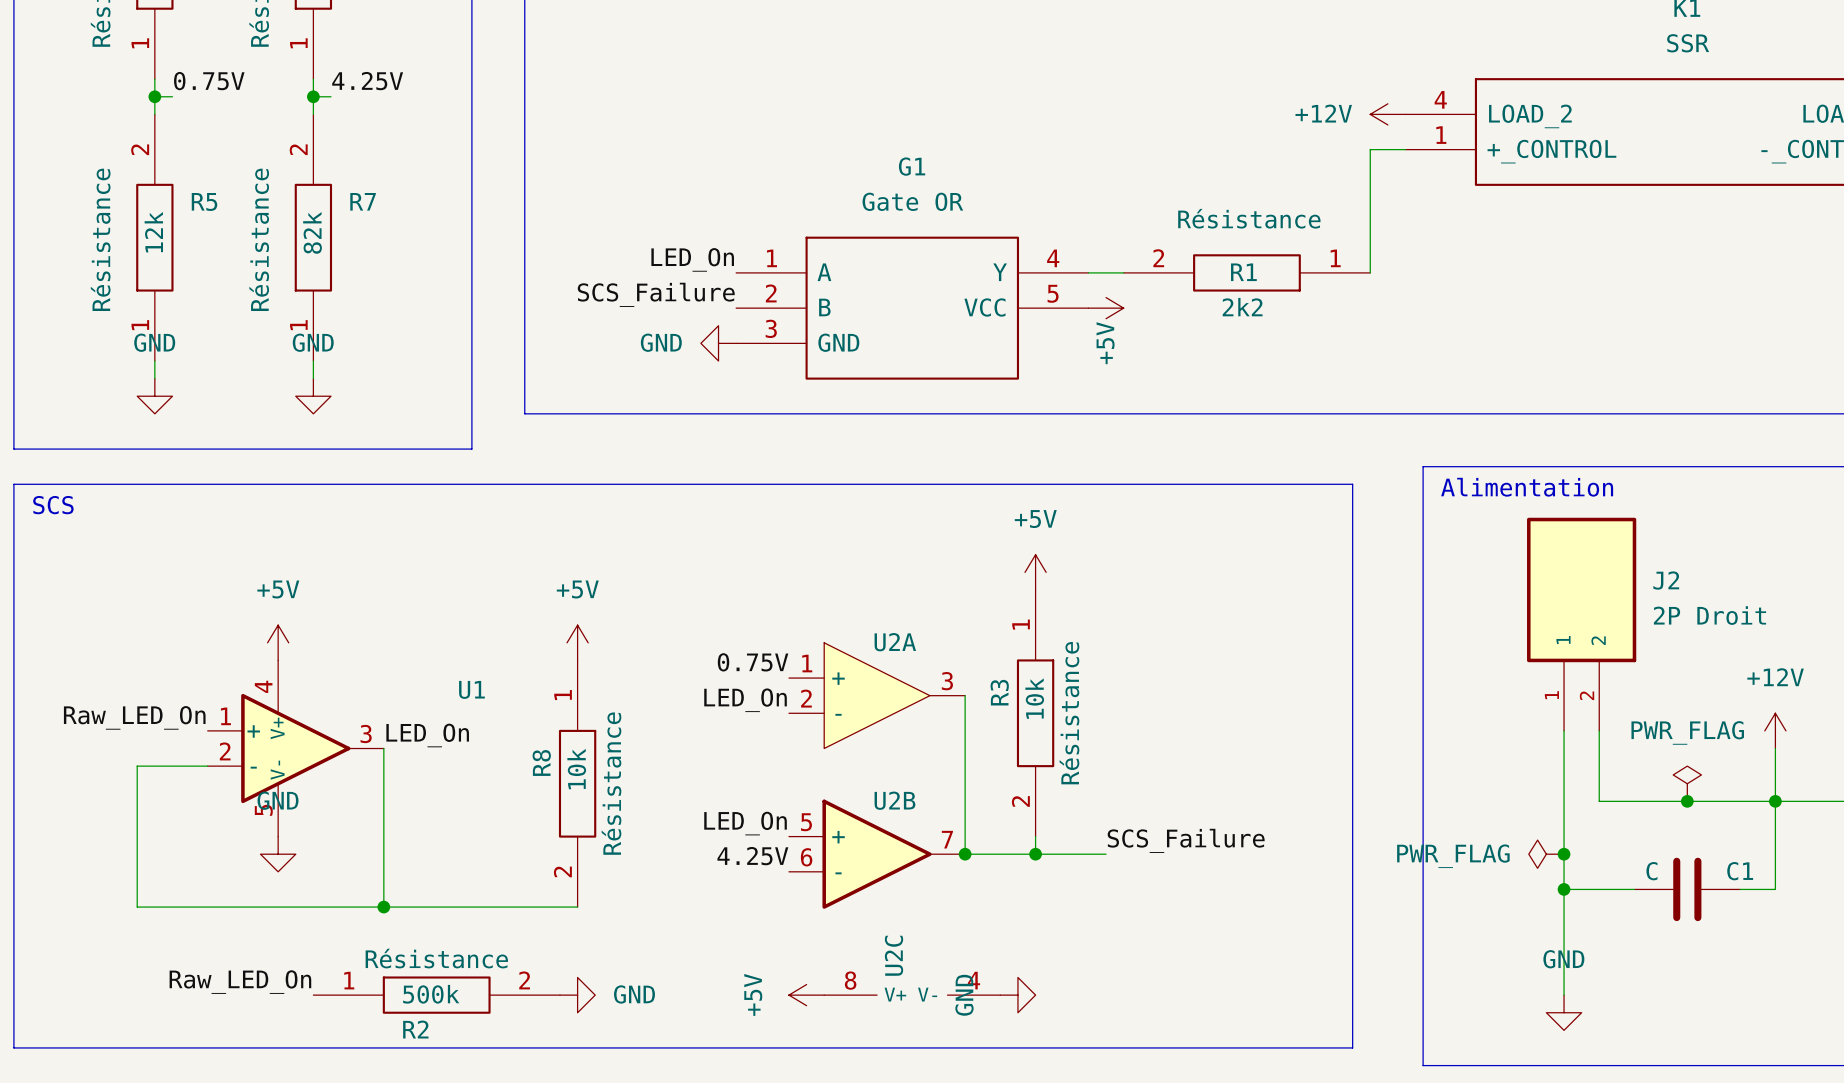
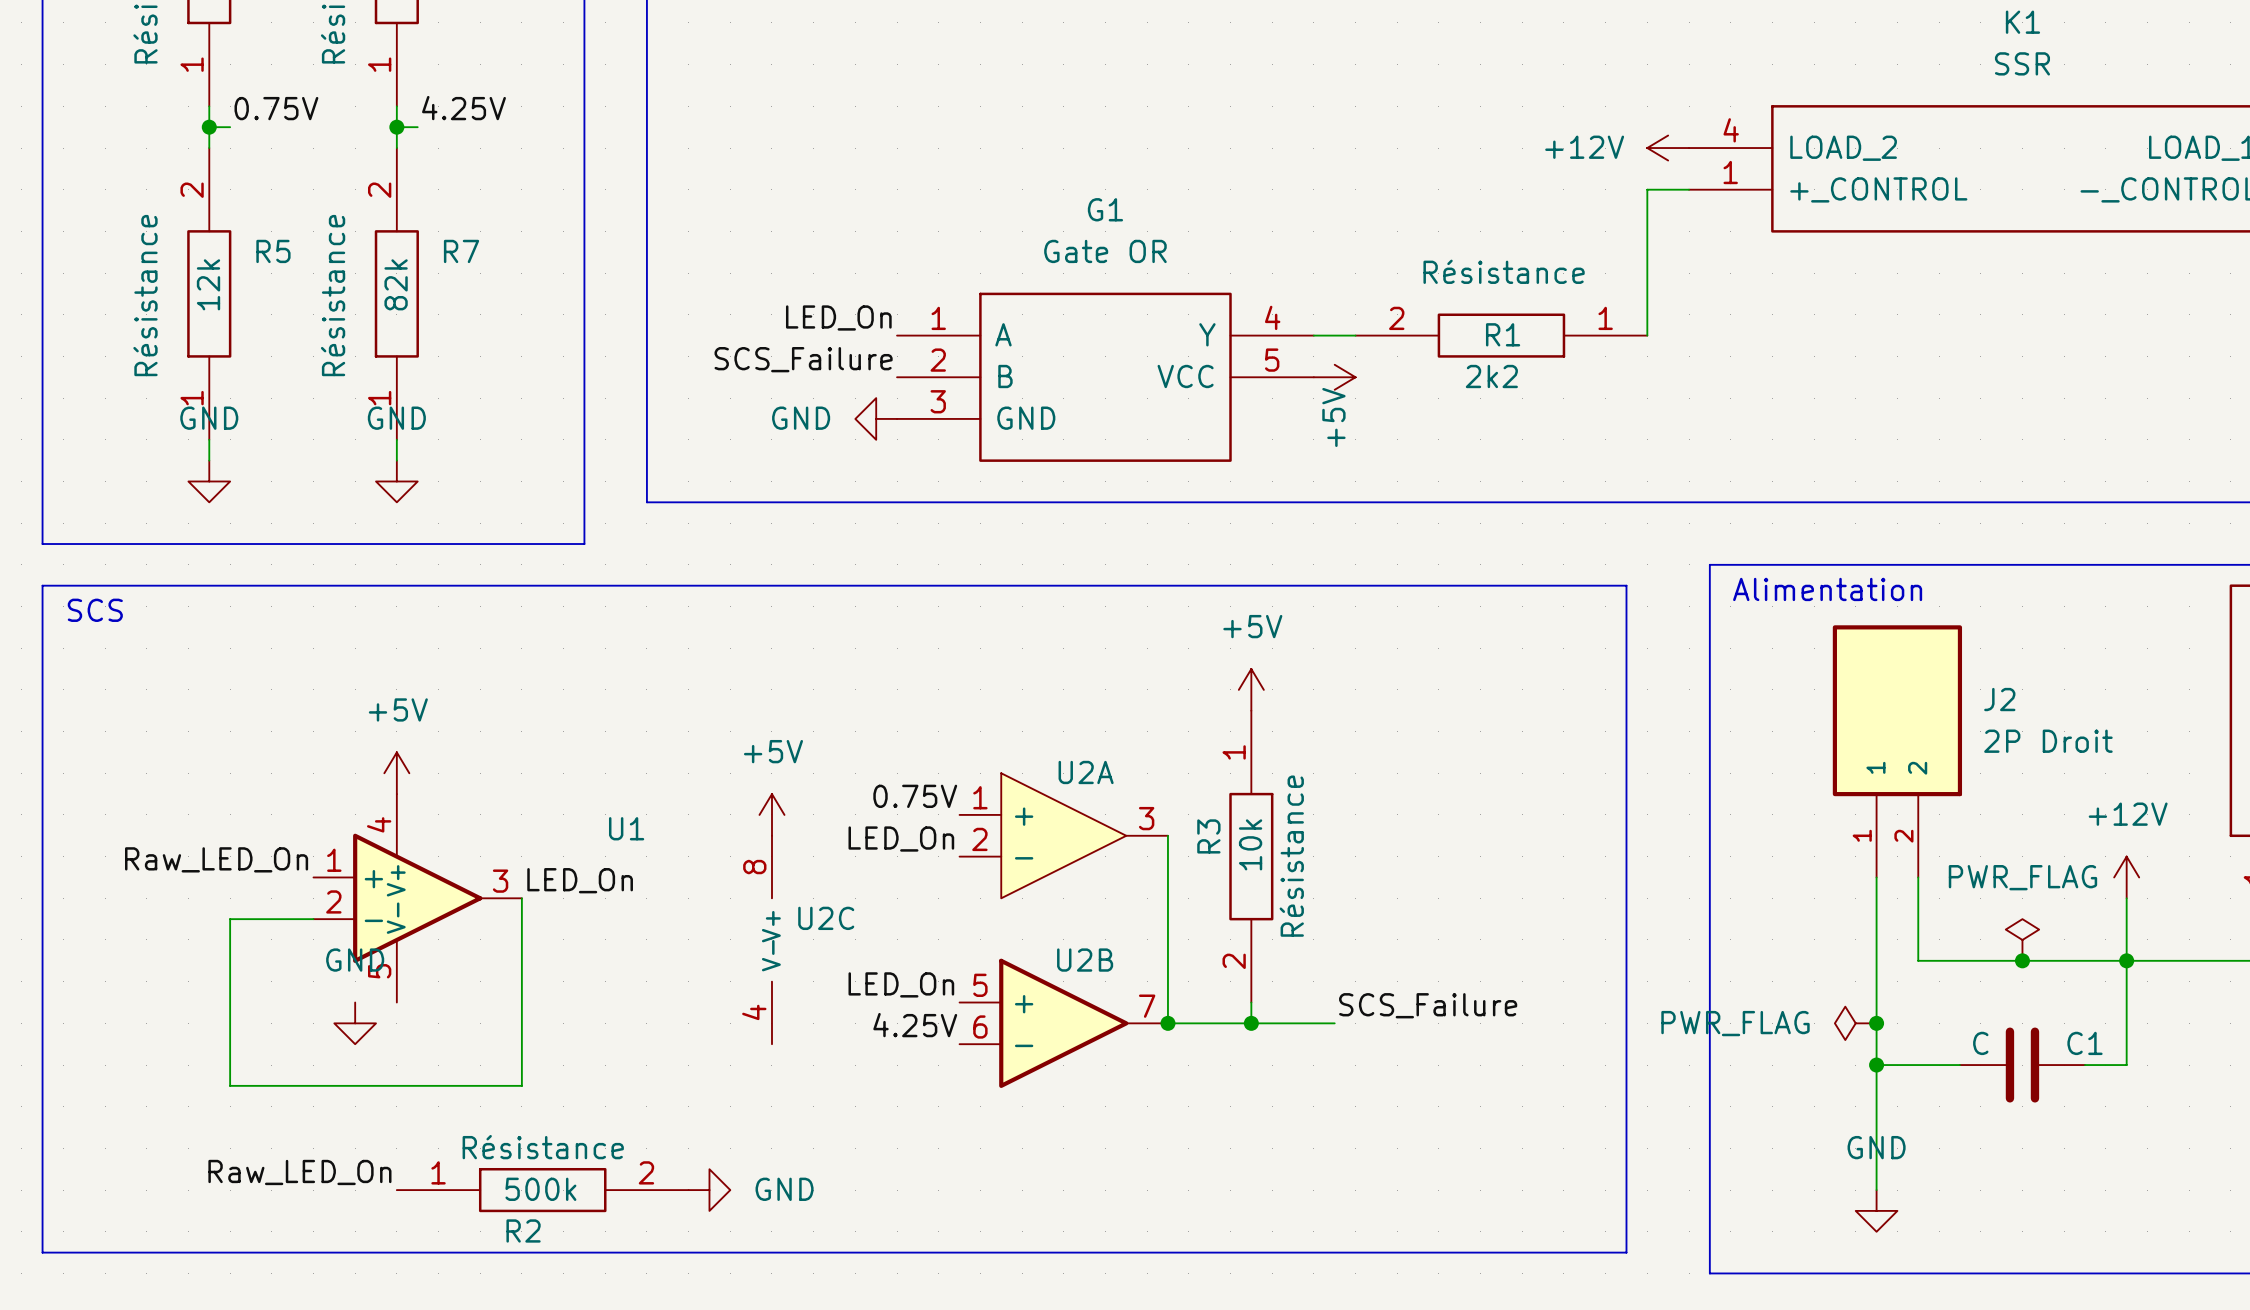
power symbol position: +5V (278, 642) -> +5V (396, 773)
power symbol position: +5V (577, 642) -> +5V (771, 814)
label position: Raw_LED_On (134, 717) -> Raw_LED_On (216, 859)
label position: LED_On (427, 735) -> LED_On (580, 880)
U1 position: (295, 748) -> (417, 898)
wire: (383, 748) (383, 907) -> none
wire: (172, 766) (137, 766) (137, 907) (172, 907) -> (230, 919) (230, 1085)
R8: 10k (577, 783) -> none
junction: (383, 907) -> none
wire: (419, 907) (577, 907) -> (521, 1085) (521, 898)
power symbol: +5V (806, 995) -> none
U2C rotation: 0° (912, 995) -> 90° clockwise (771, 939)
U2C position: (912, 995) -> (771, 939)
power symbol: GND (1017, 995) -> none

